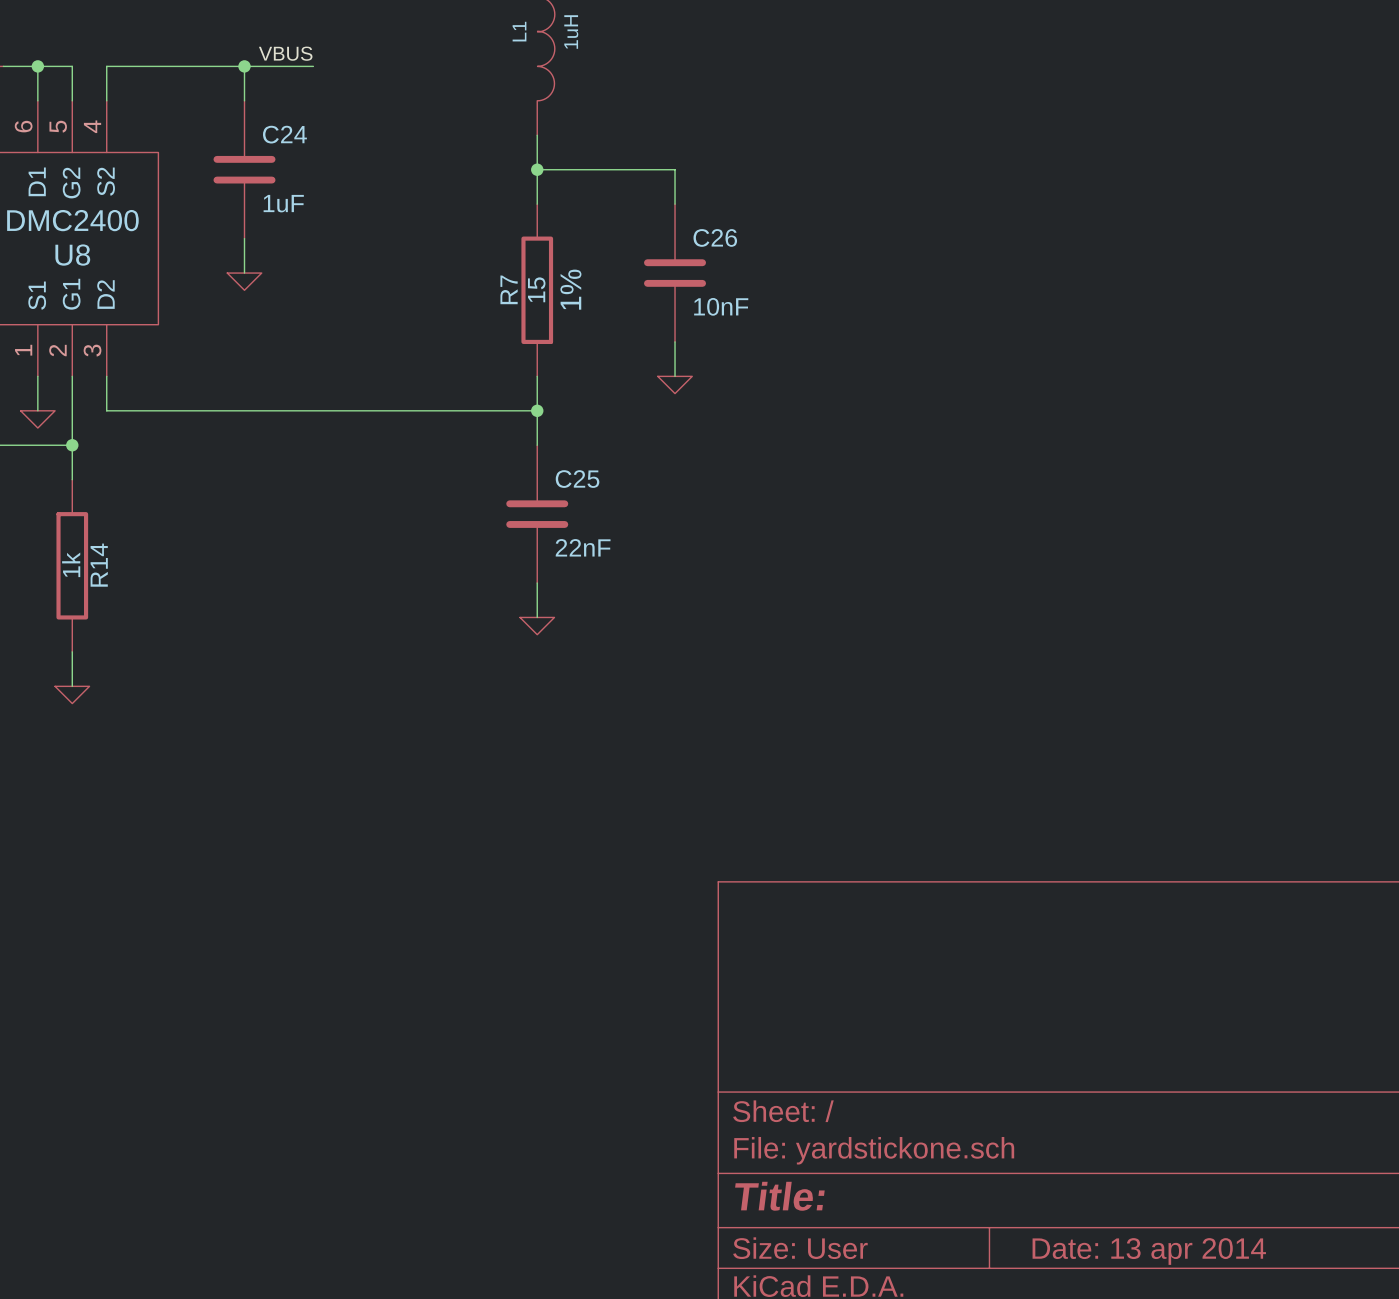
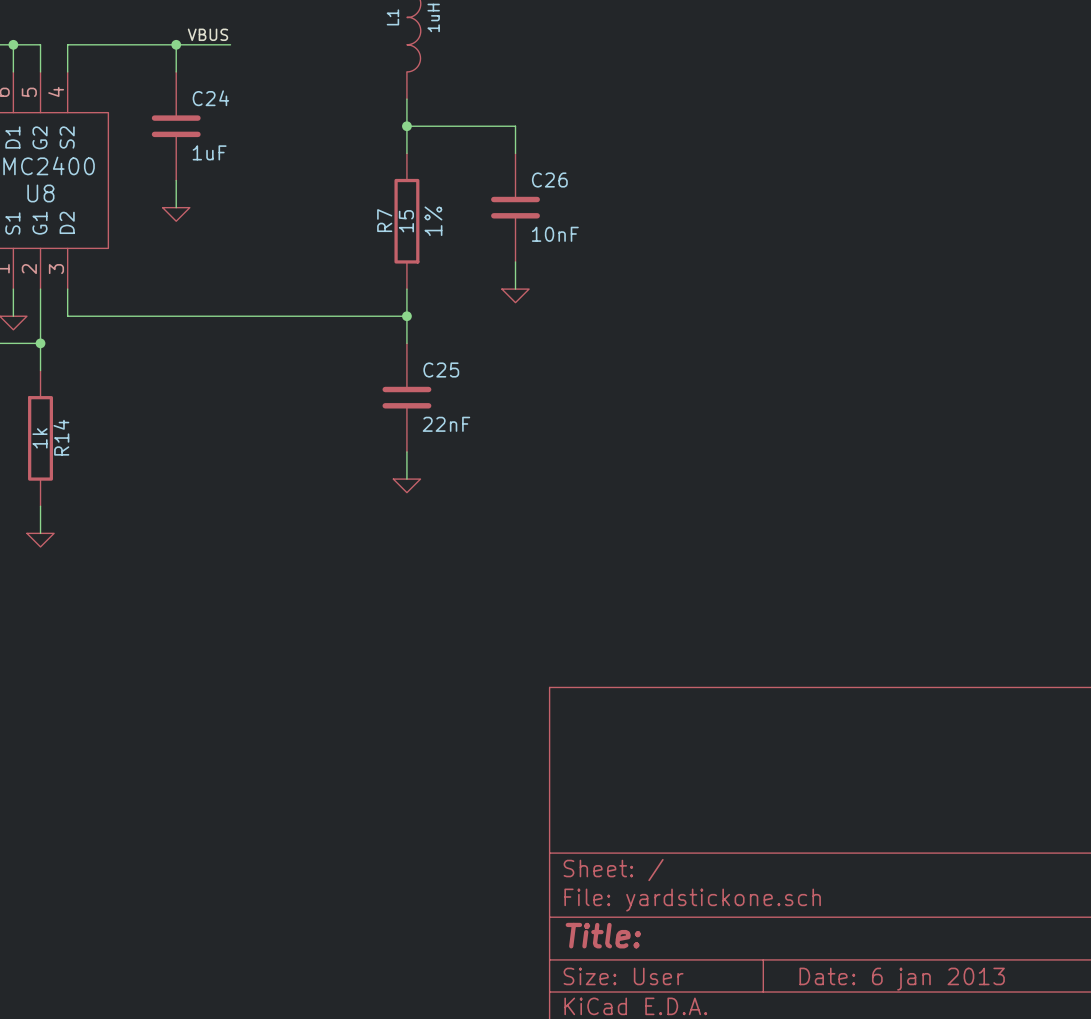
title block: Date: 13 apr 2014 (1149, 1251) -> Date: 6 jan 2013 (902, 979)

